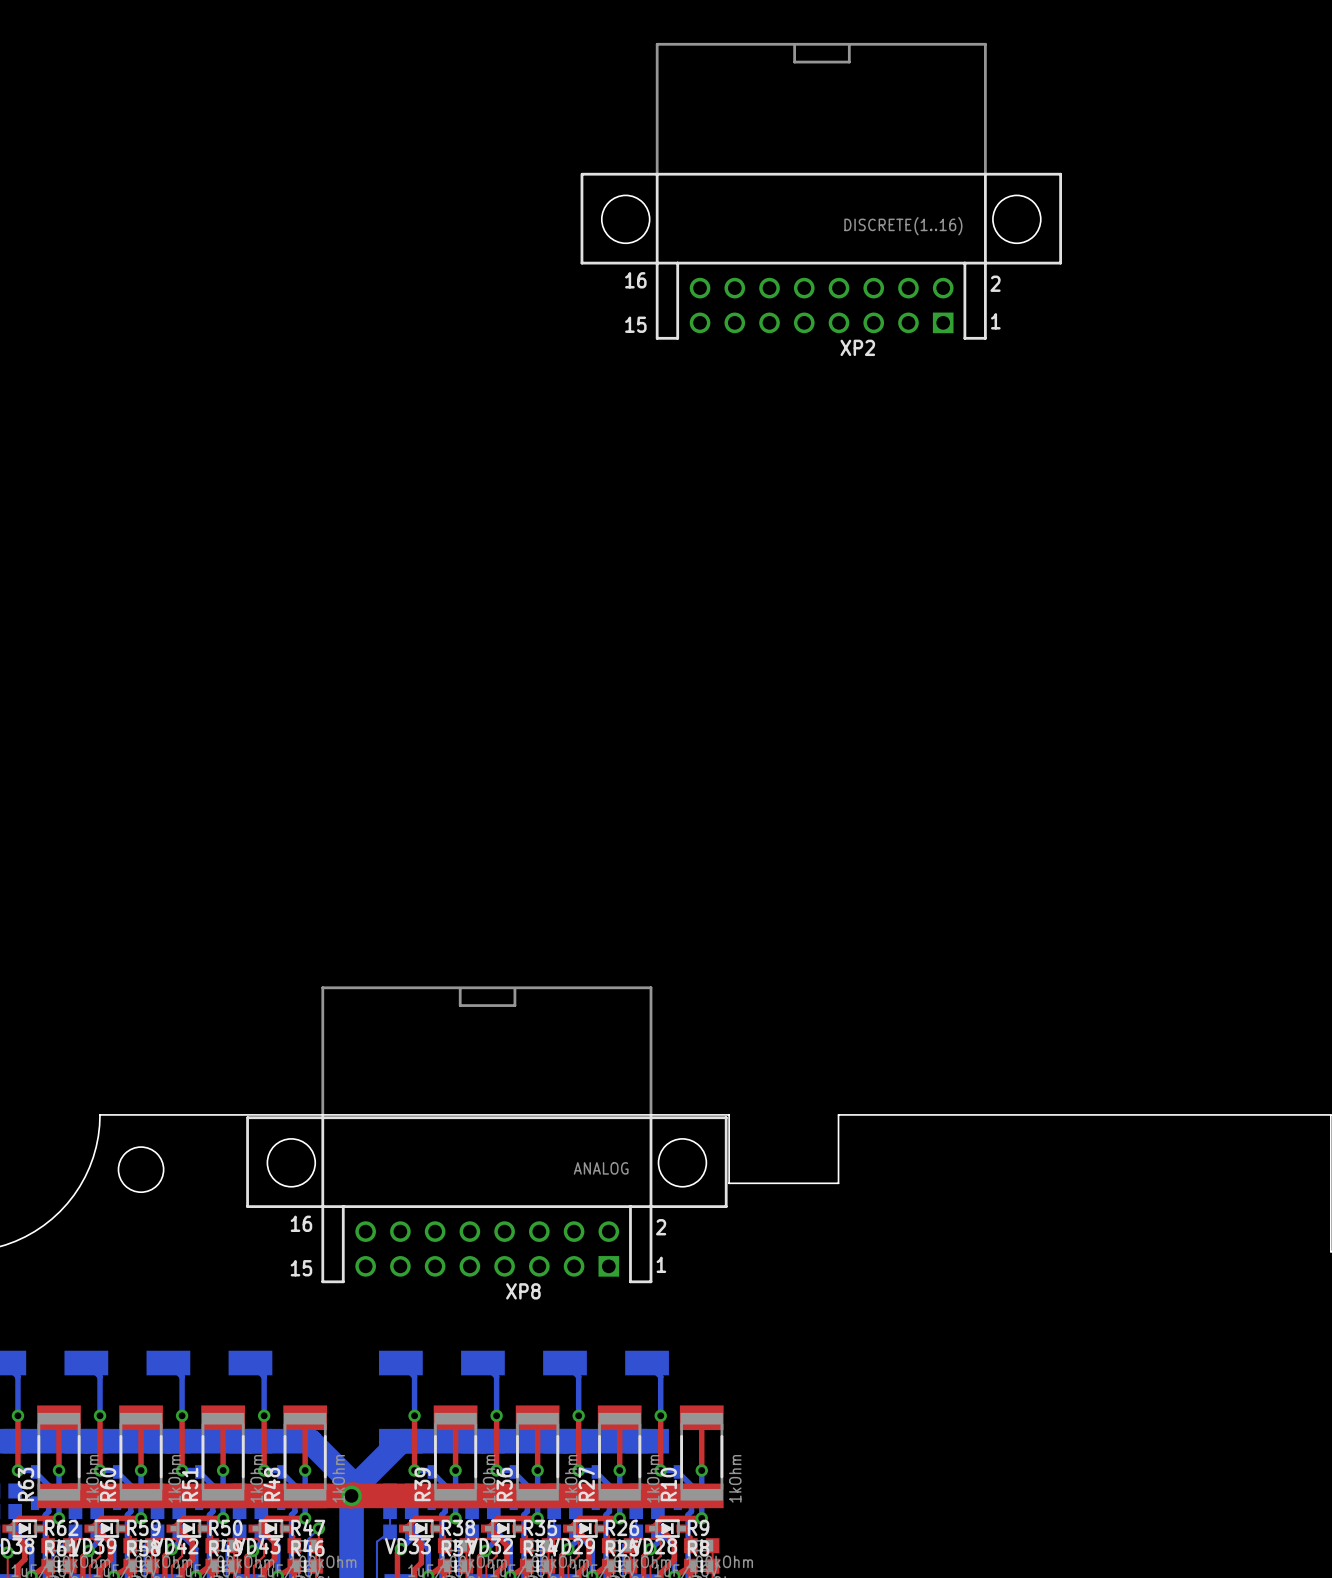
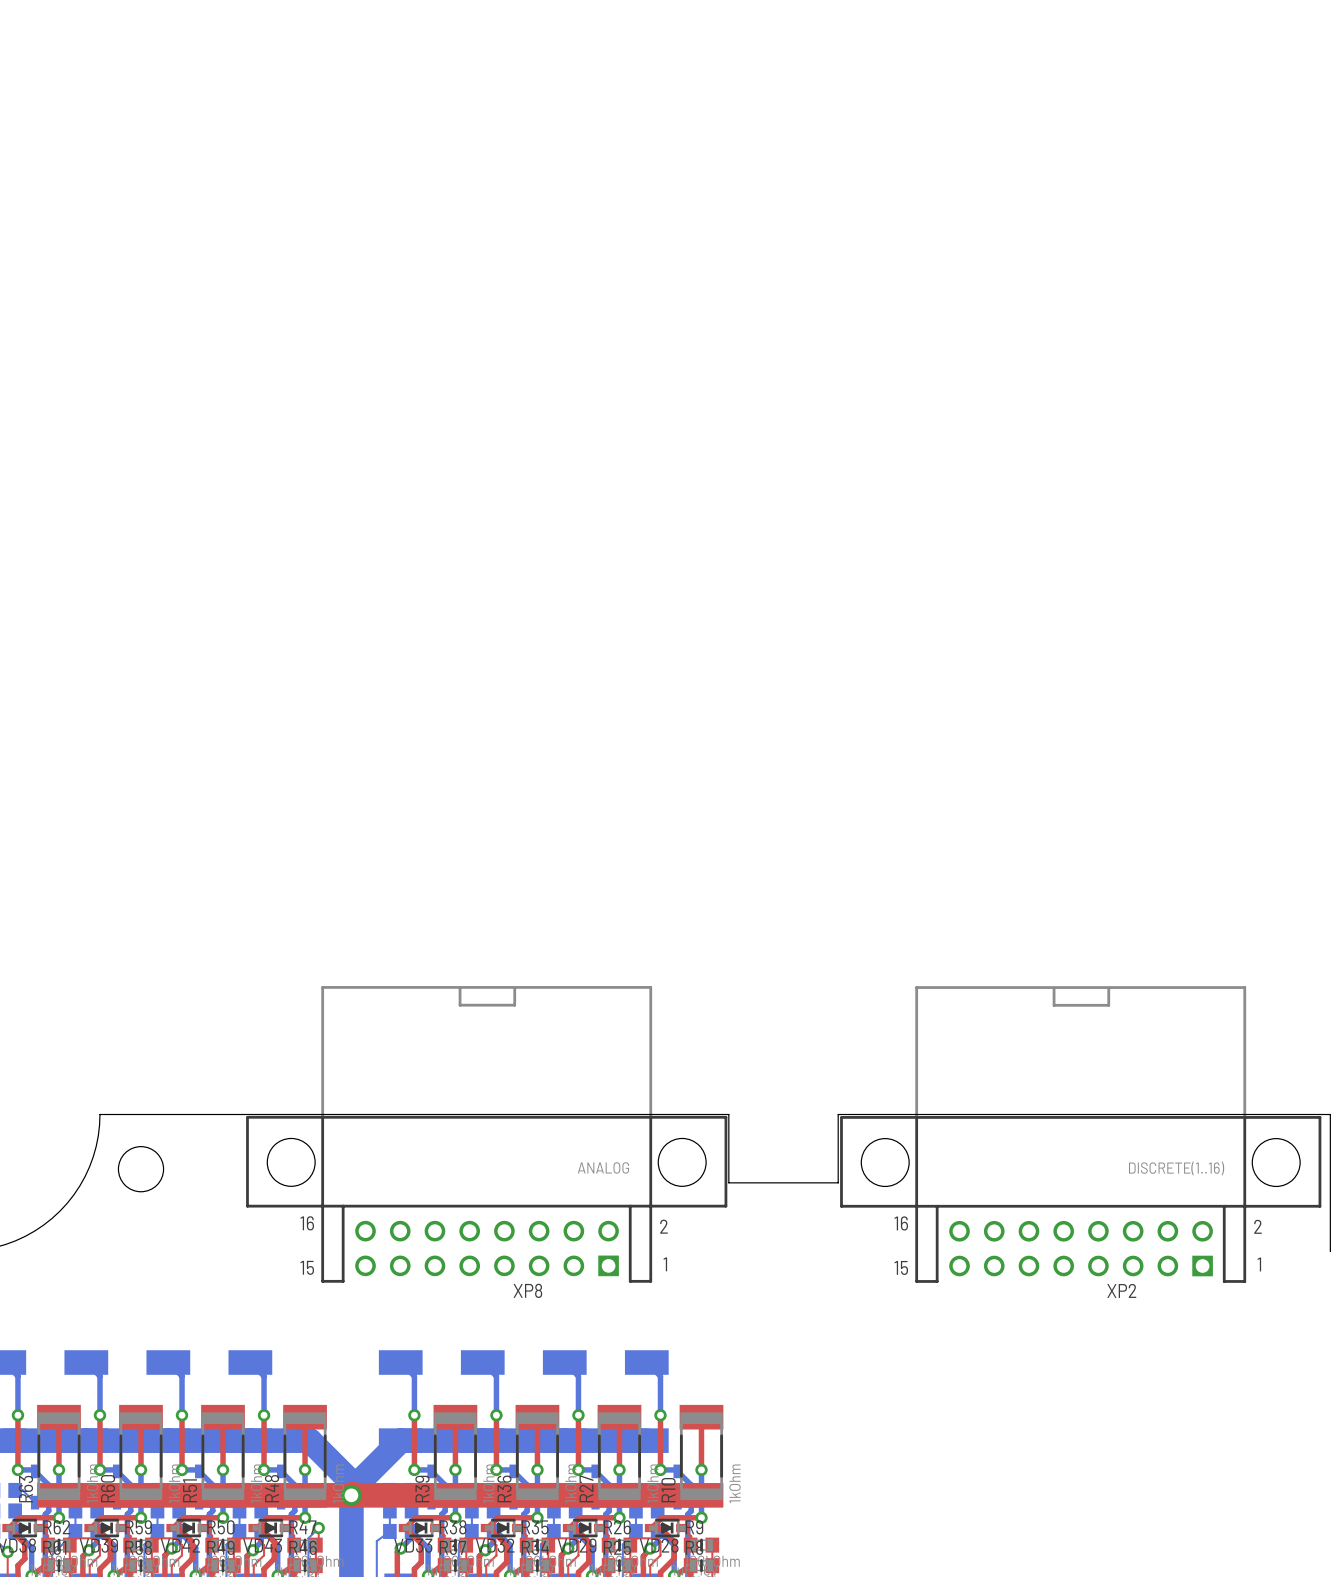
XP2 position: (821, 191) -> (1080, 1134)

